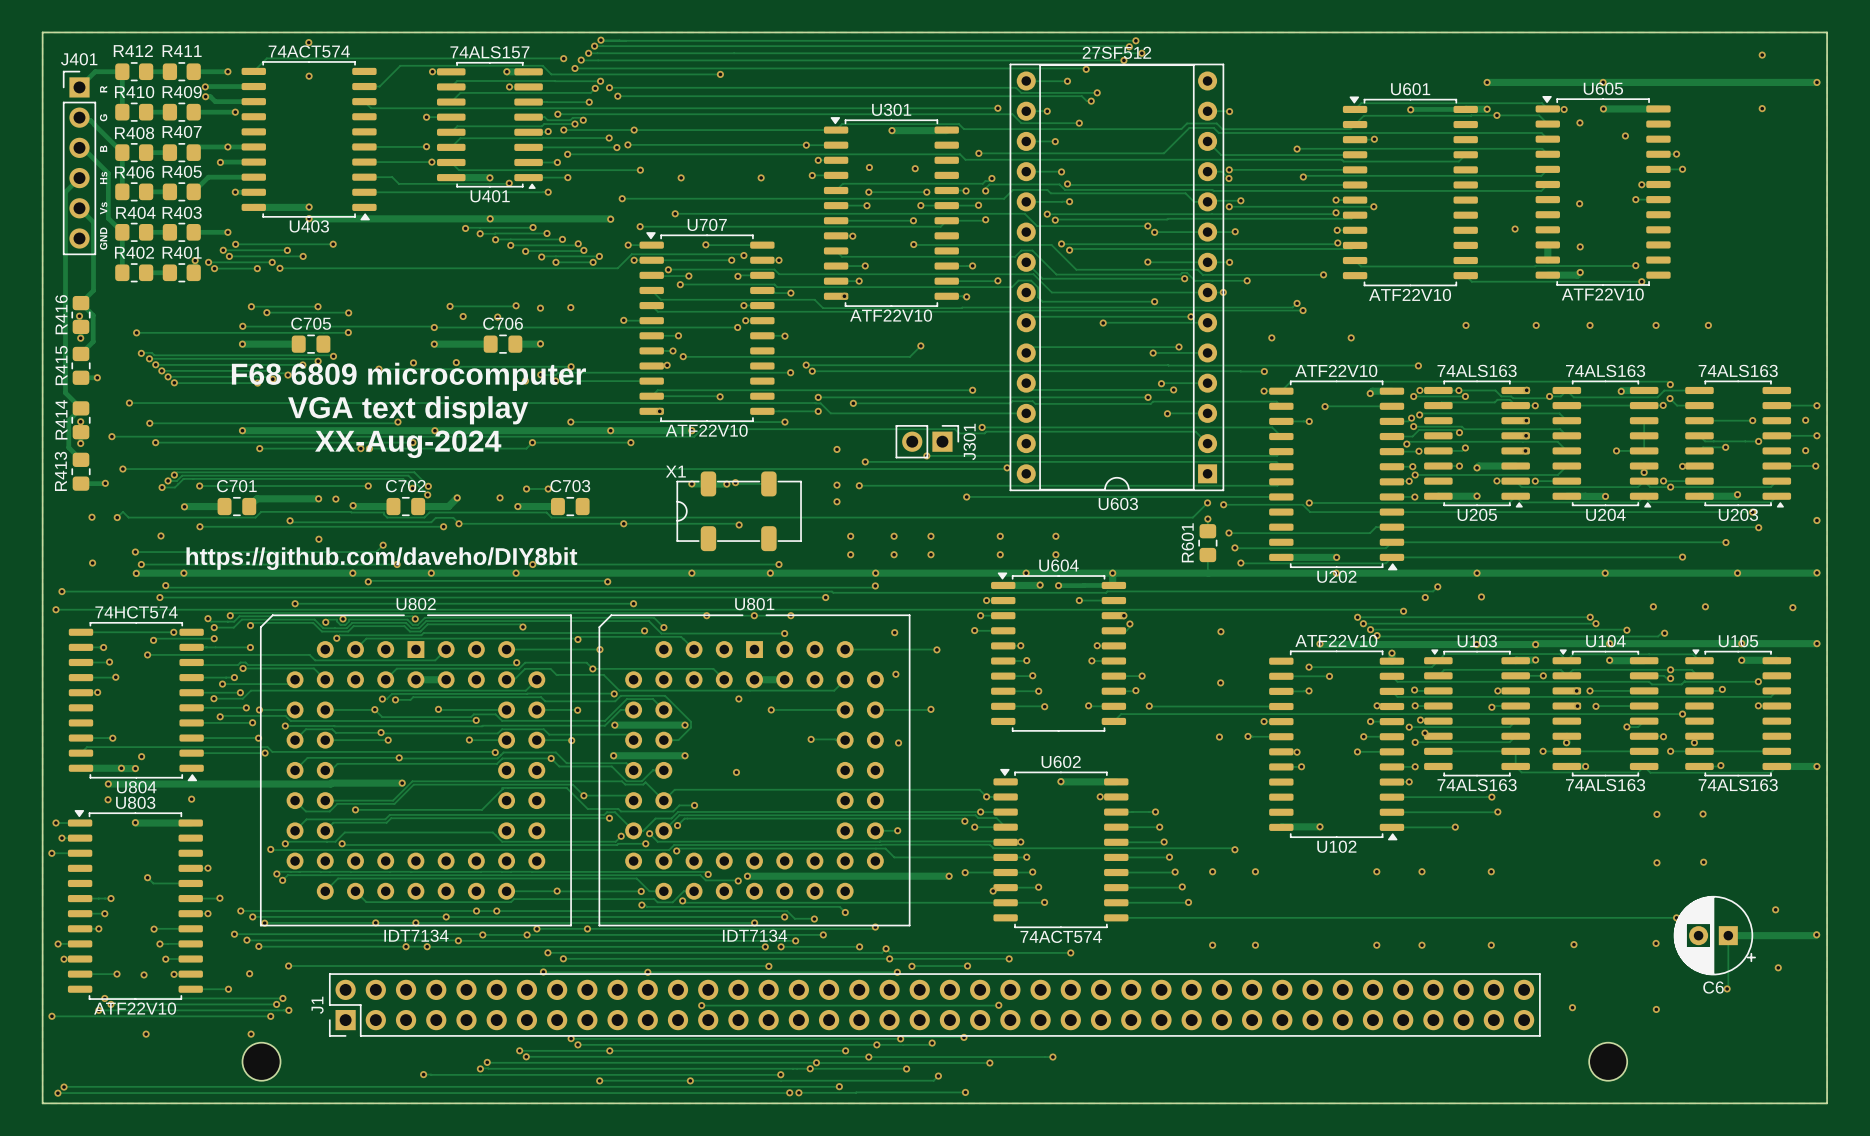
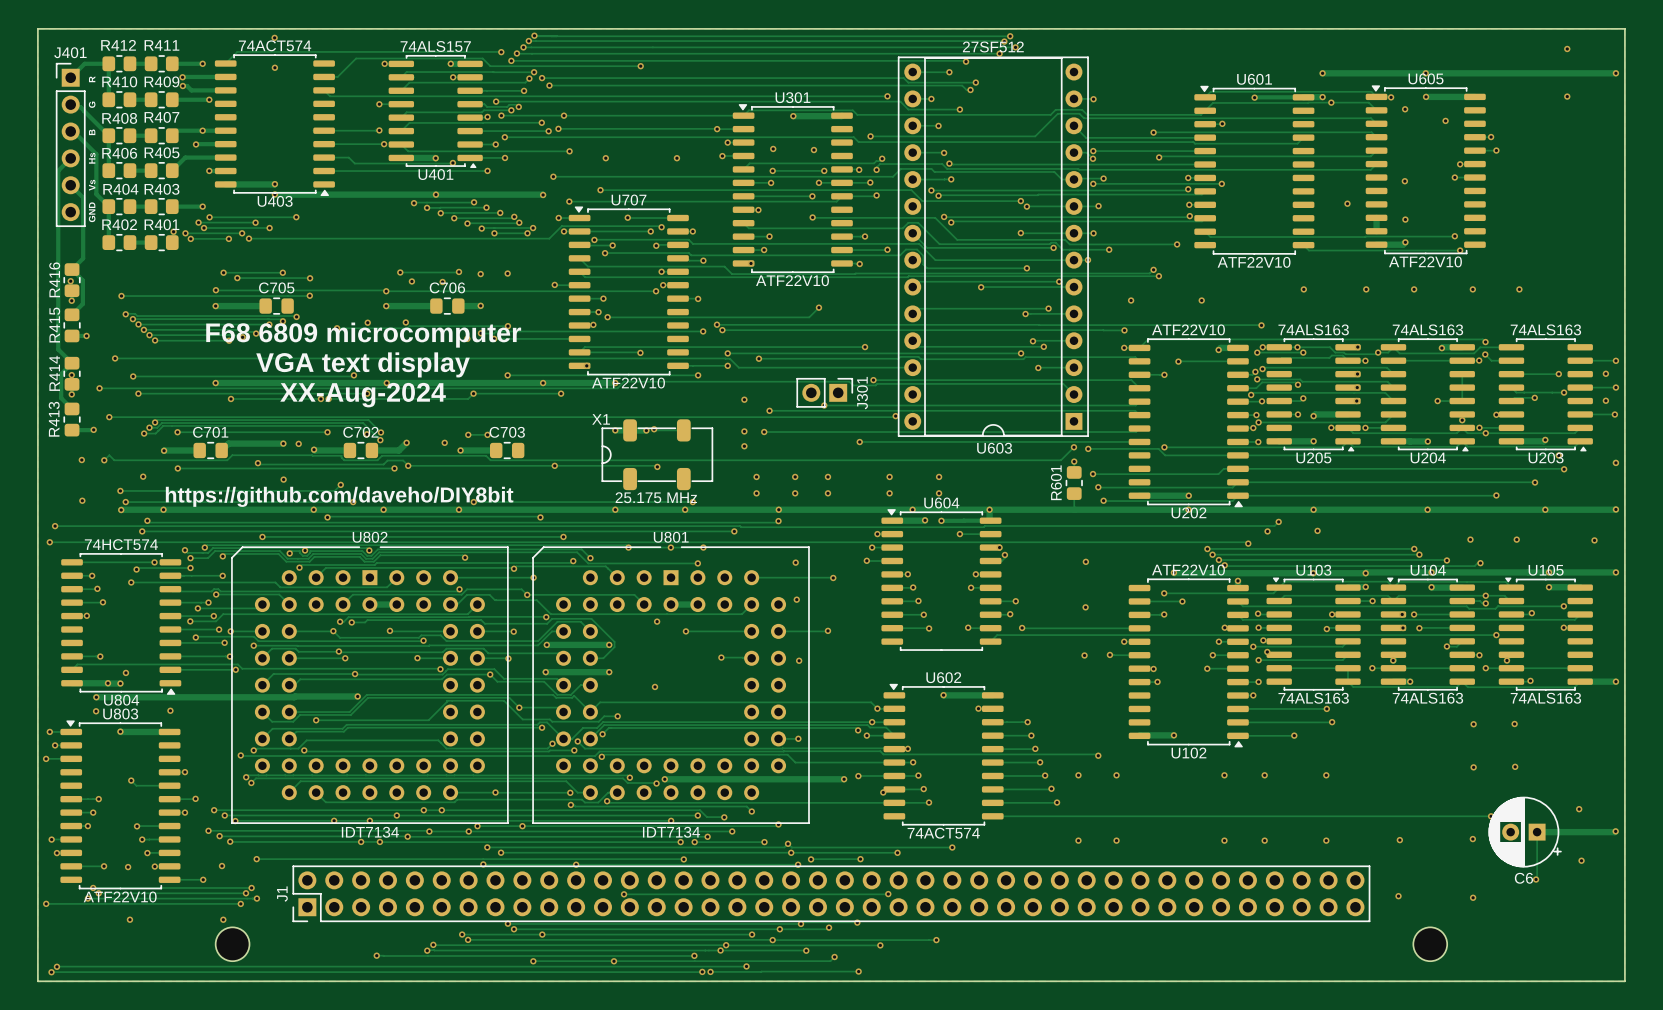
X1 value: none -> 25.175 MHz (656, 497)

